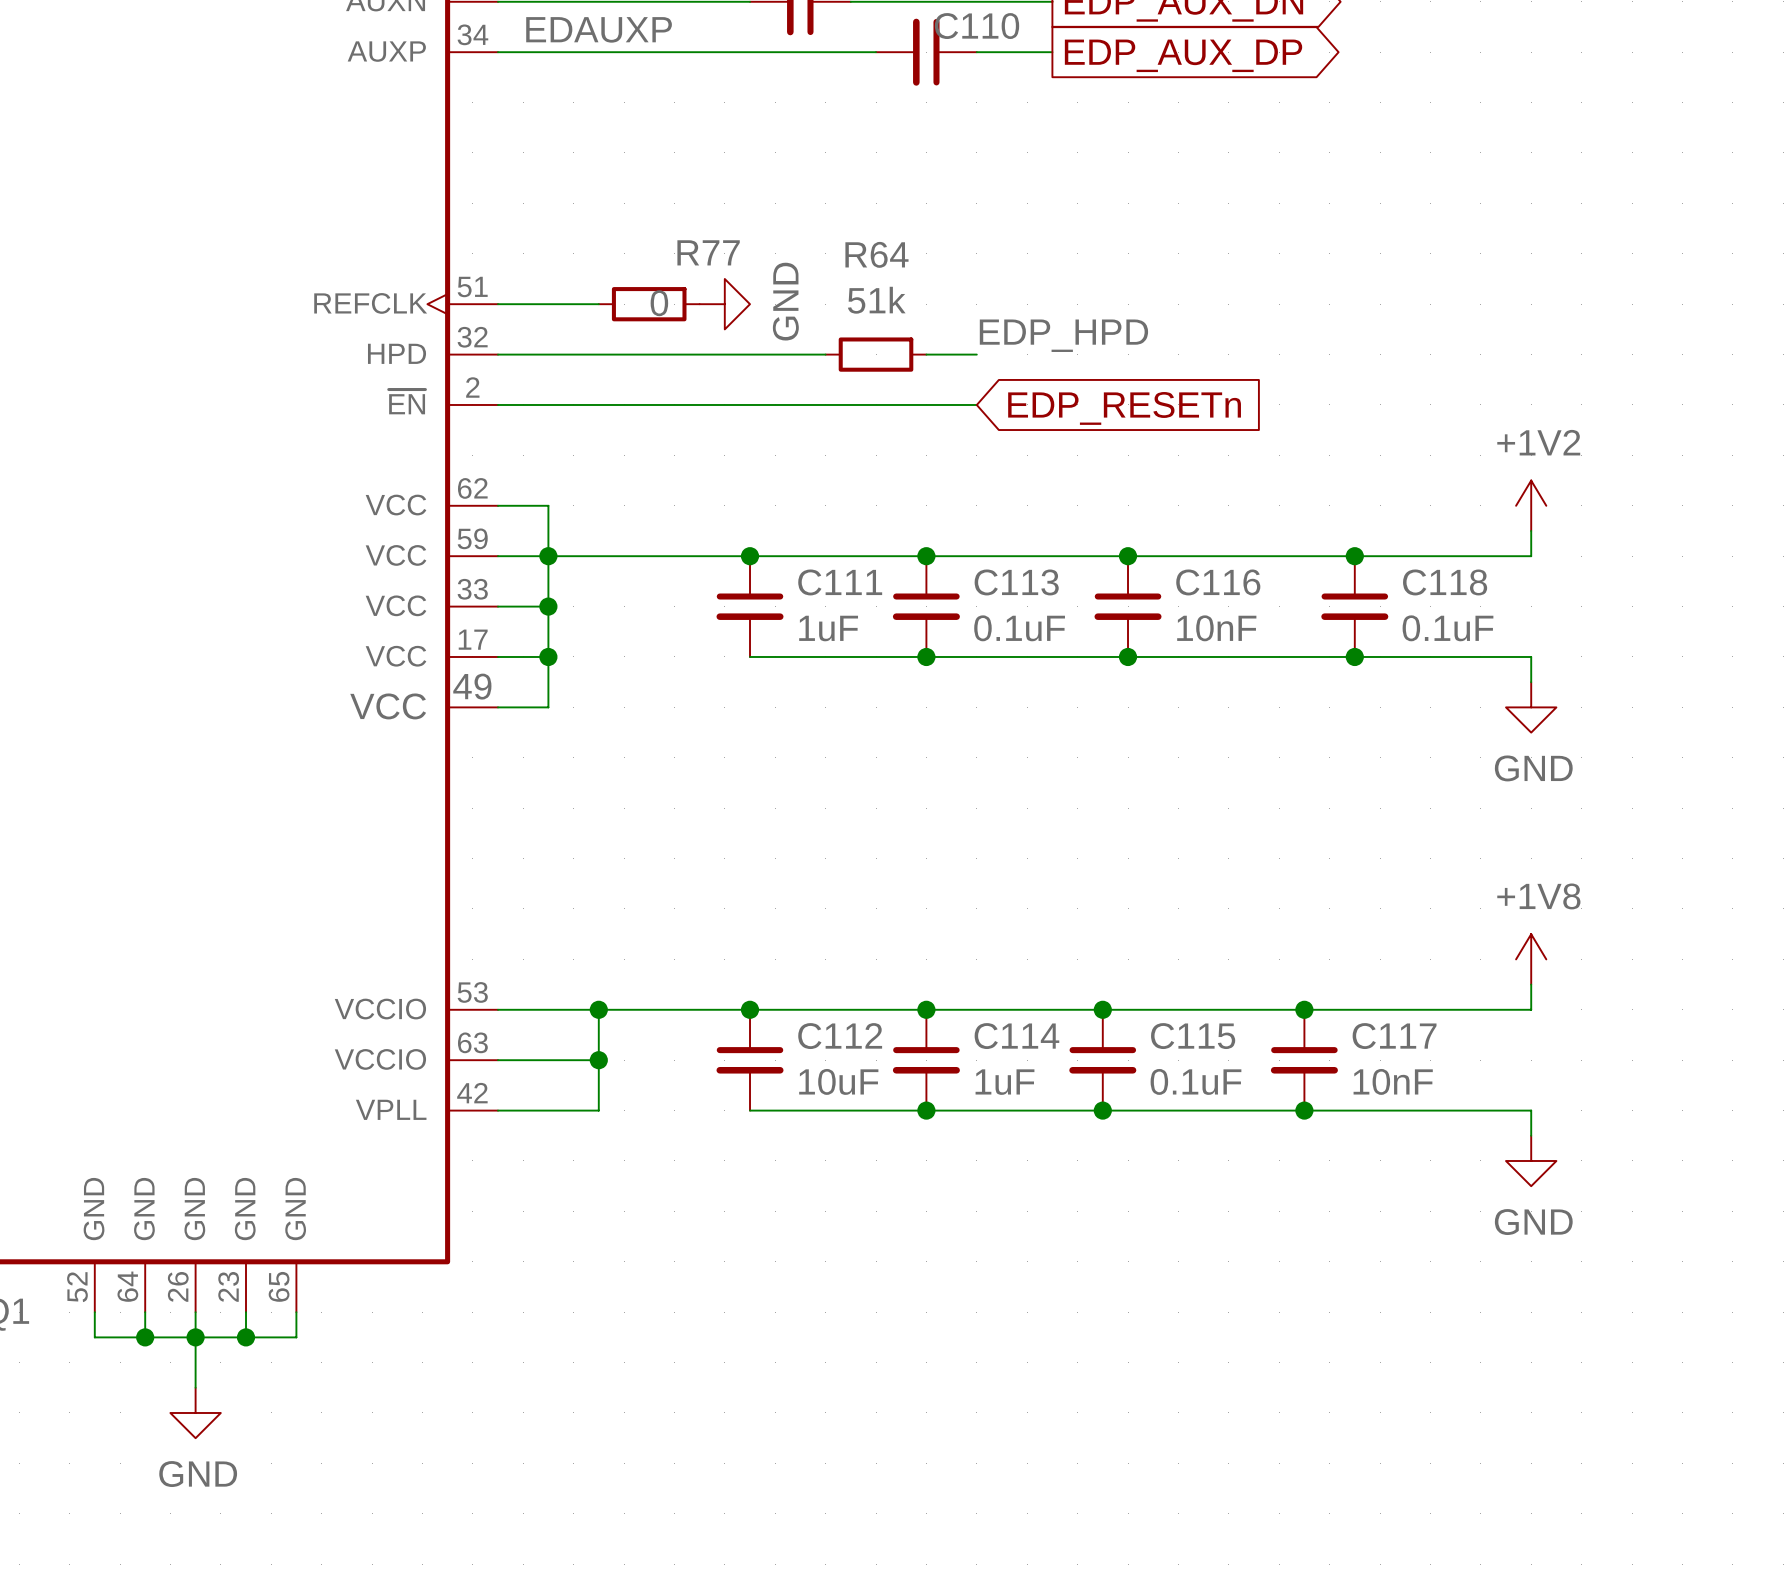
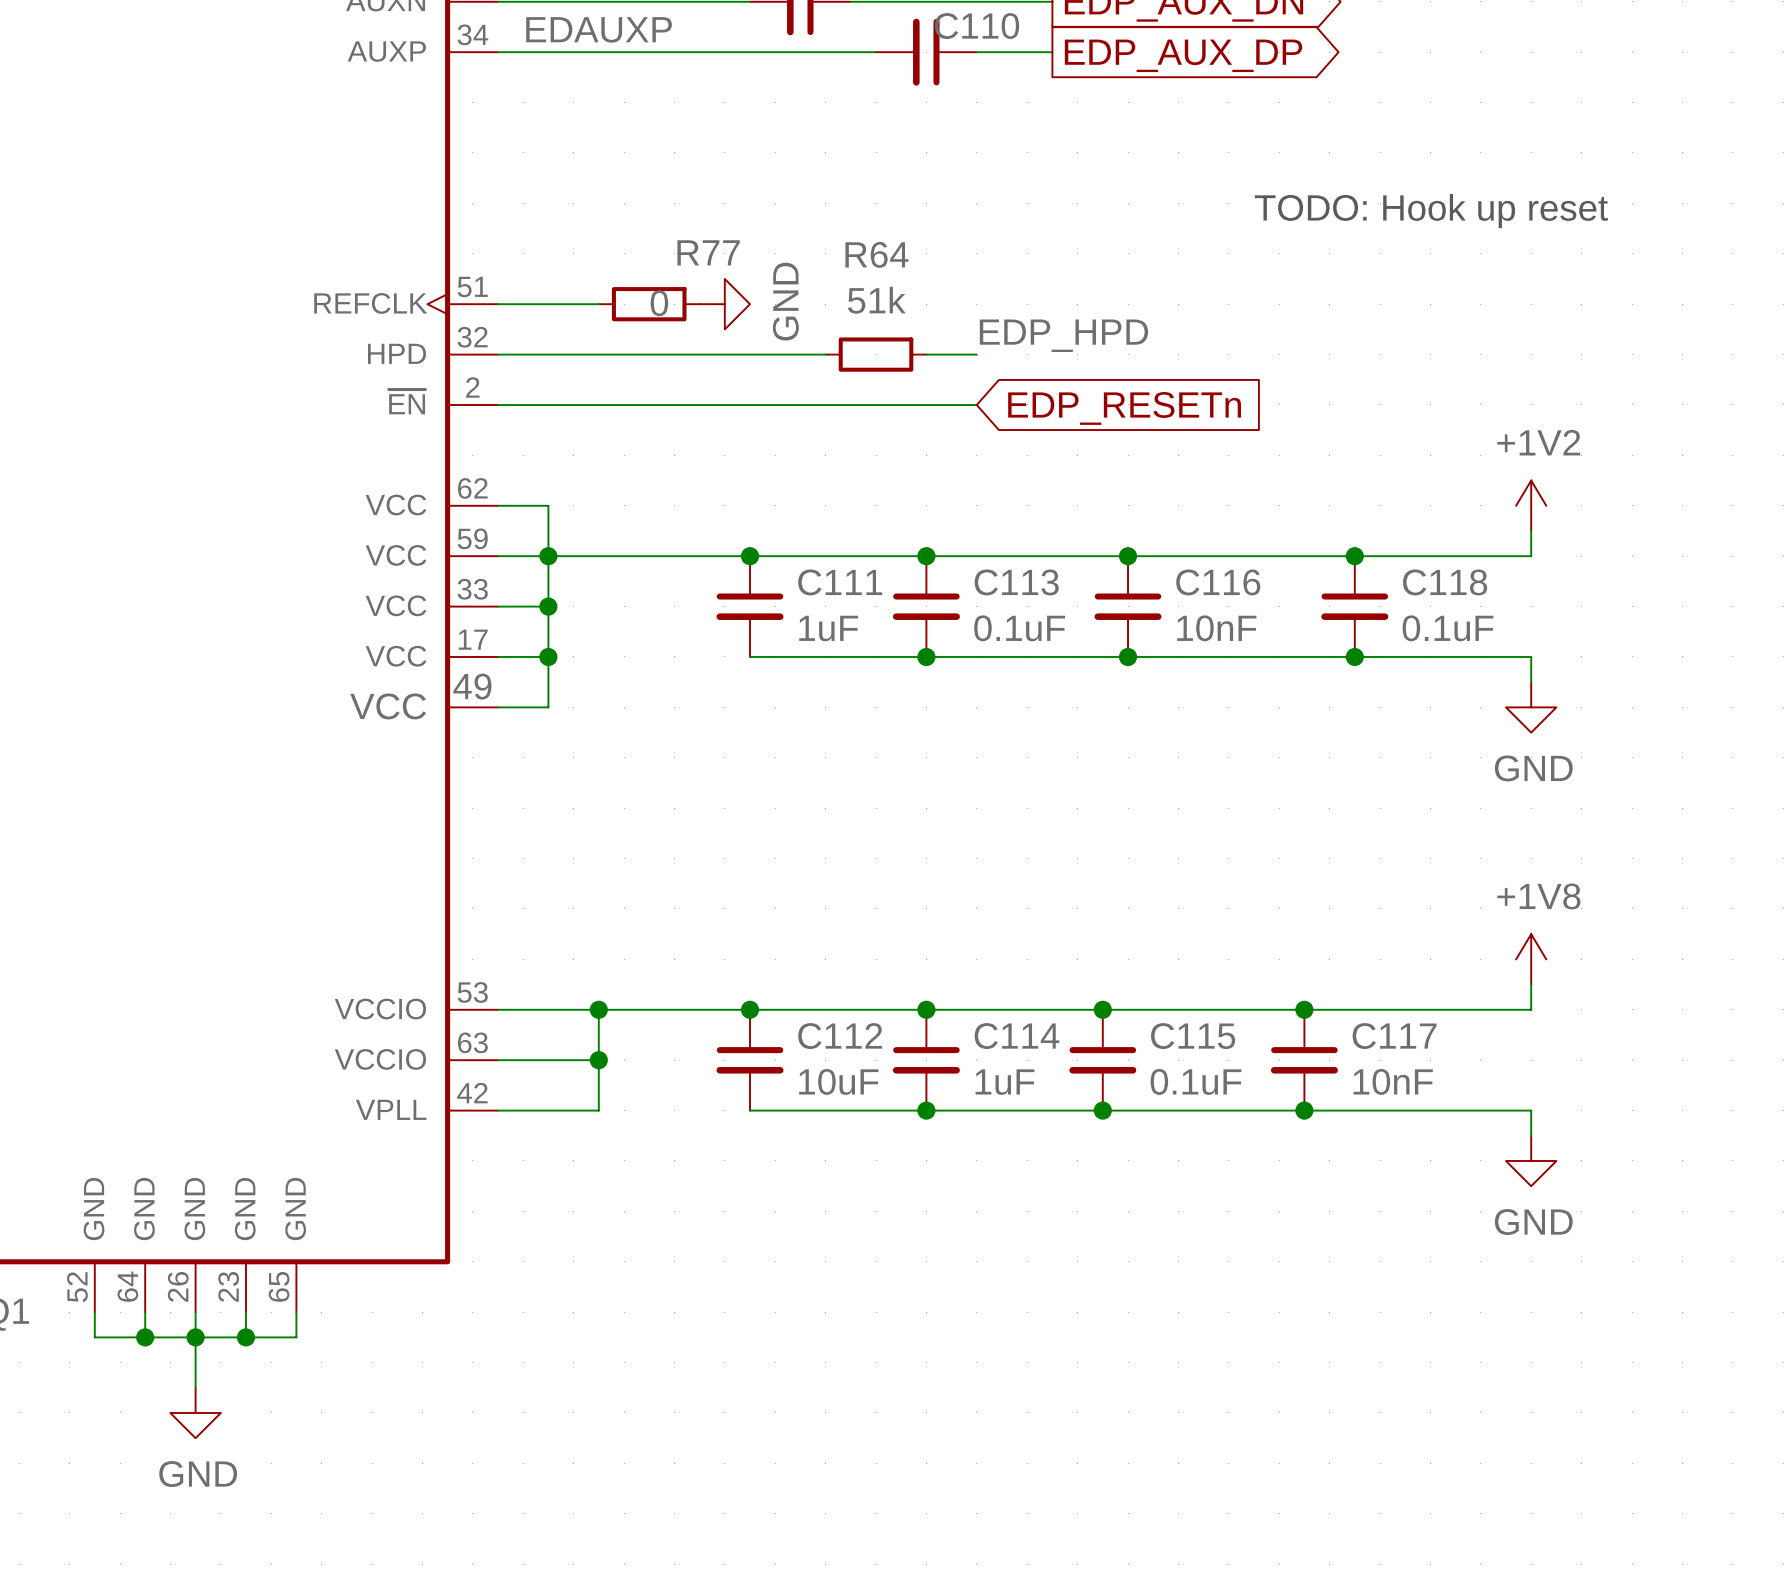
text: none -> TODO: Hook up reset (1431, 211)

